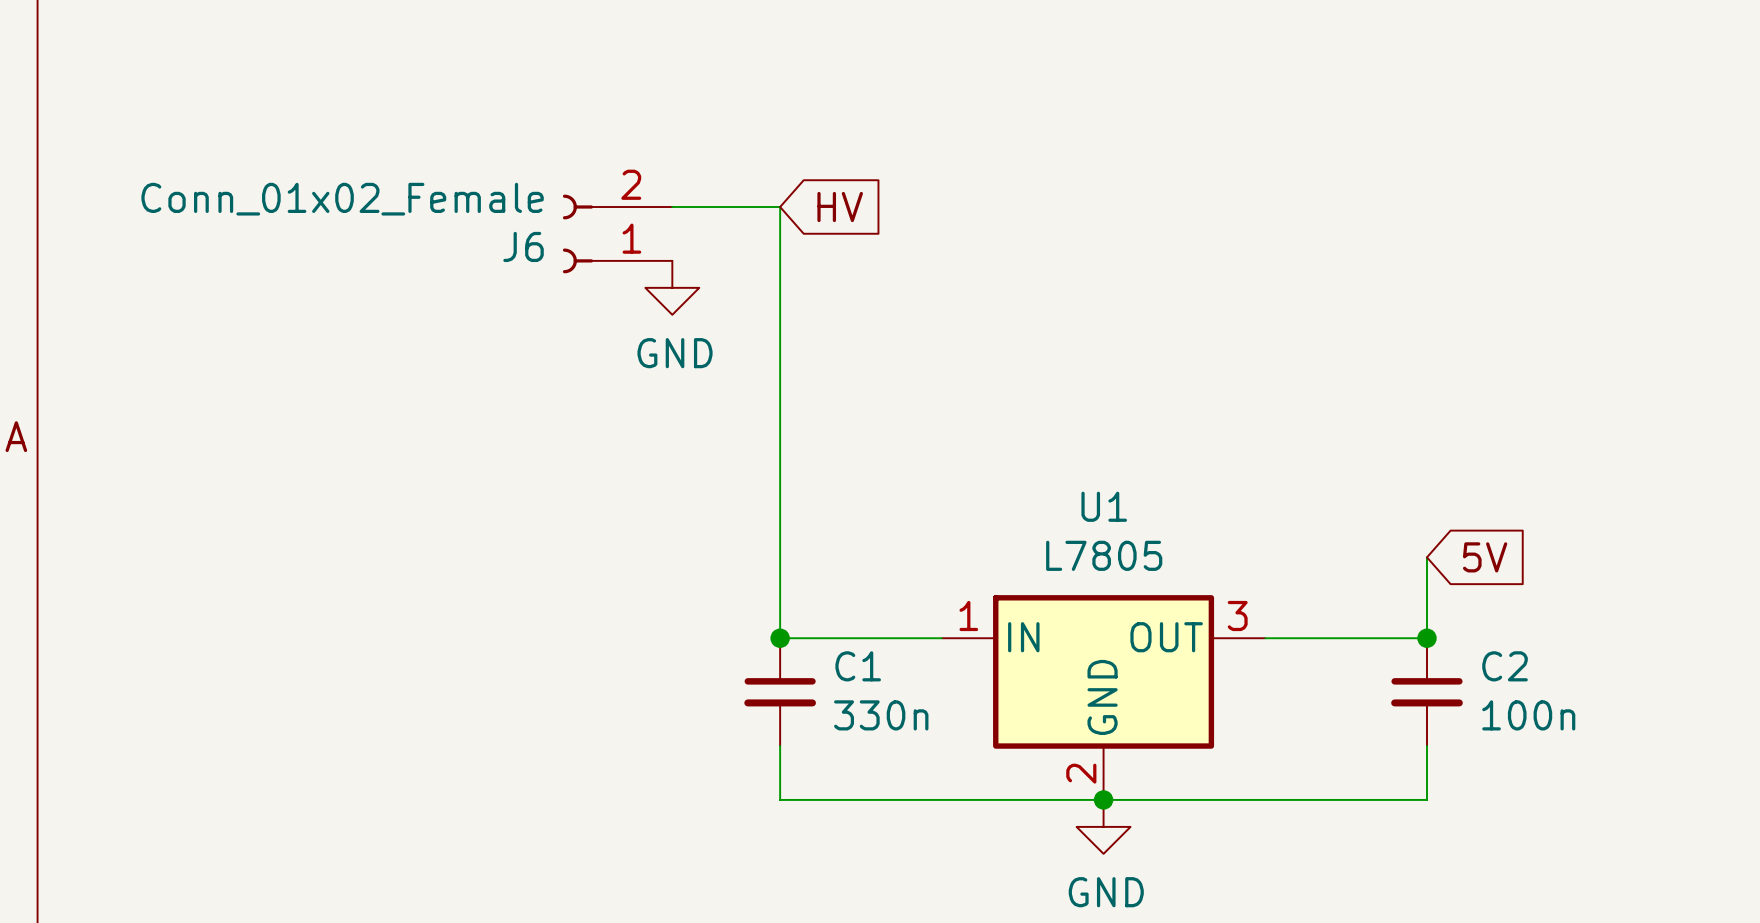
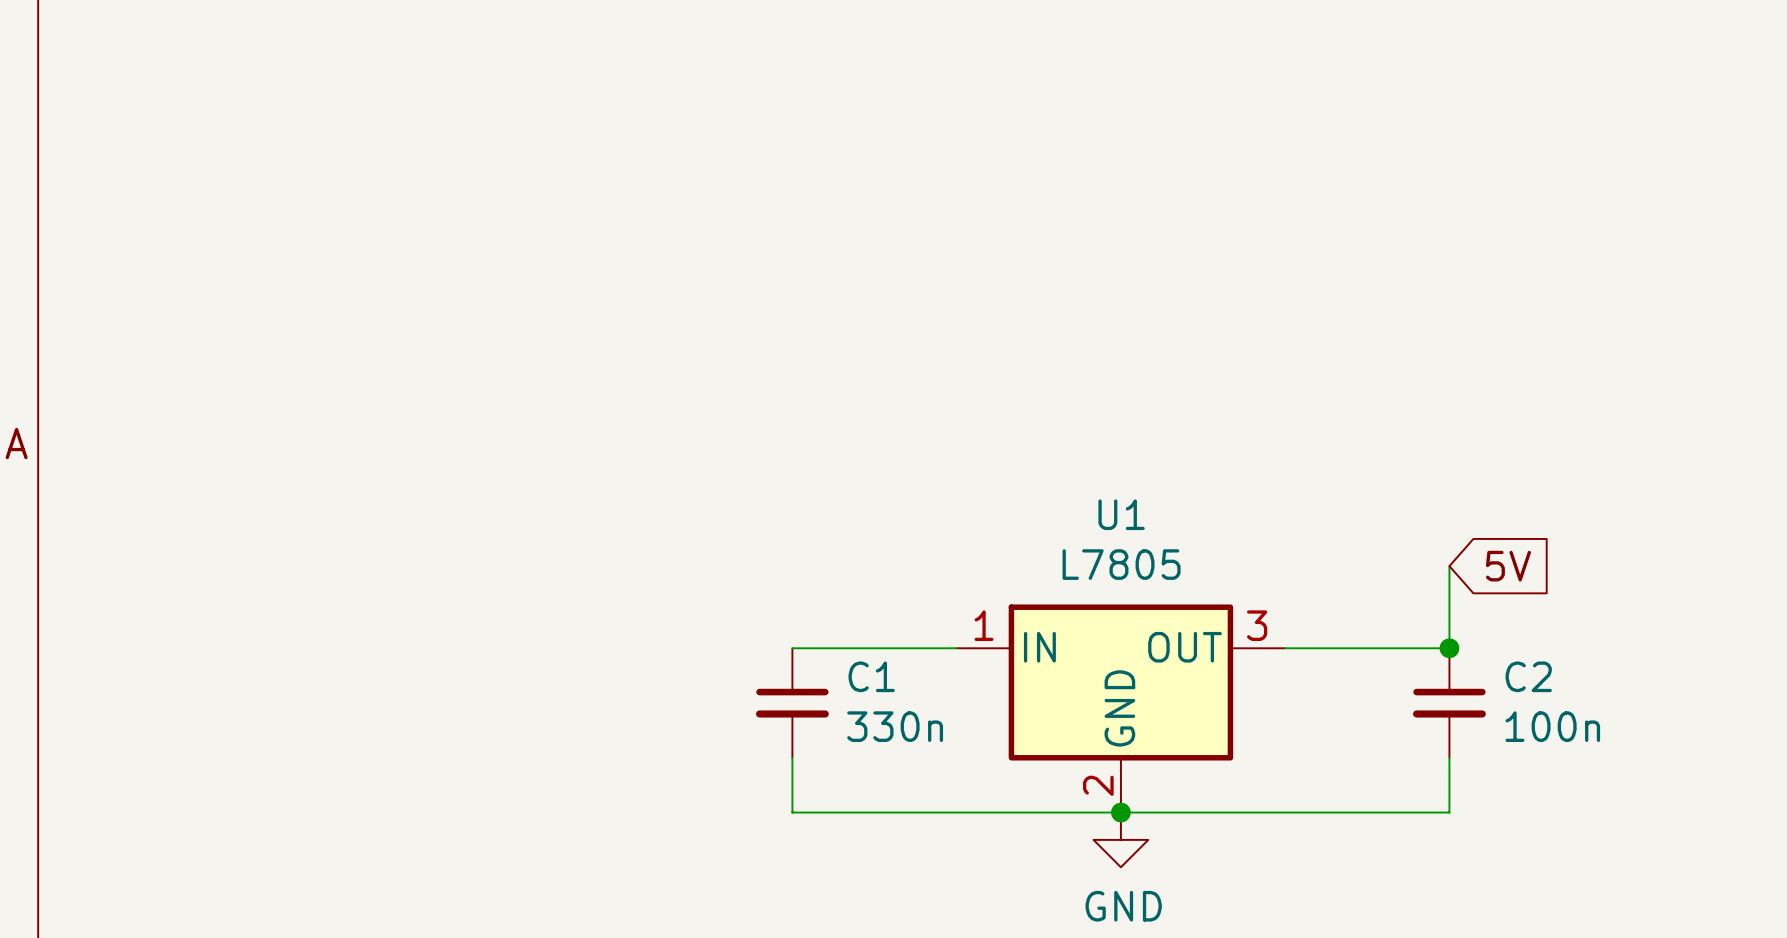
wire: (672, 206) (780, 206) (780, 638) -> none
global label: HV (840, 206) -> none
J6: Conn_01x02_Female (617, 233) -> none
power symbol: GND (672, 287) -> none
junction: (780, 638) -> none

